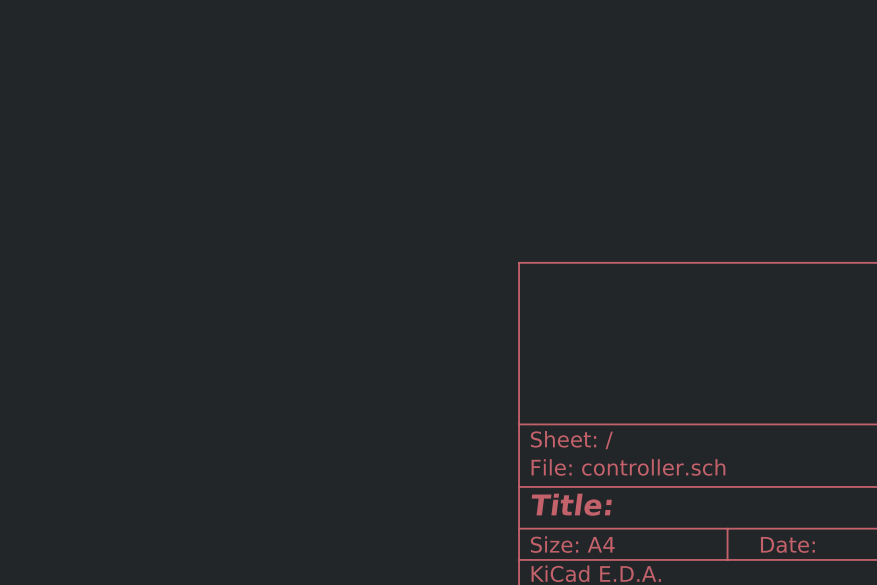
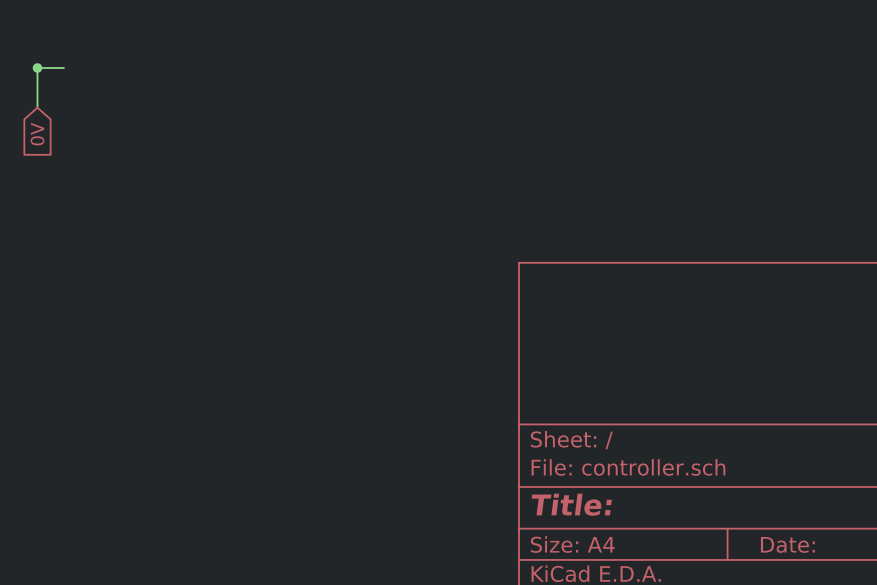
junction: none -> (37, 68)
wire: none -> (63, 68) (37, 68) (37, 107)
global label: none -> 0V (37, 134)

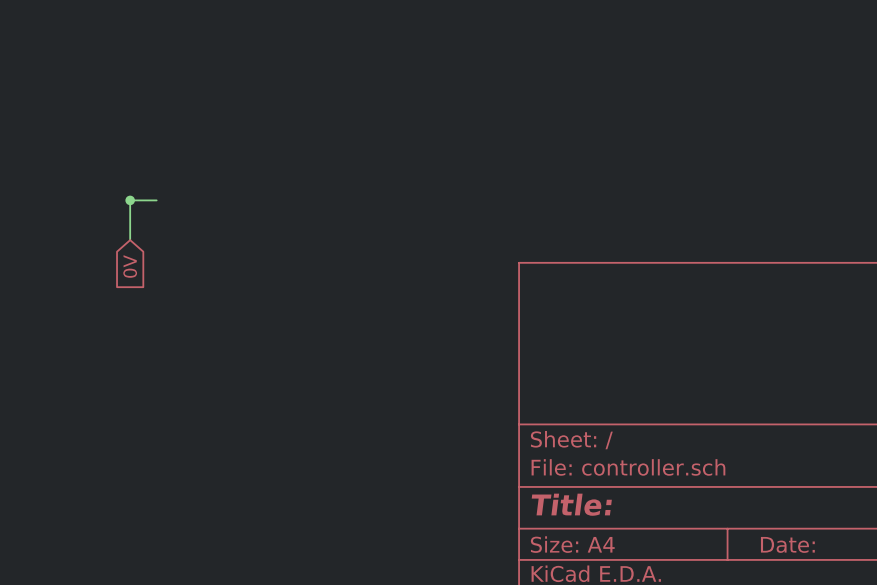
junction: (37, 68) -> none
wire: (63, 68) (37, 68) (37, 107) -> (156, 200) (130, 200) (130, 240)
global label position: 0V (37, 134) -> 0V (130, 266)
junction: none -> (130, 200)

